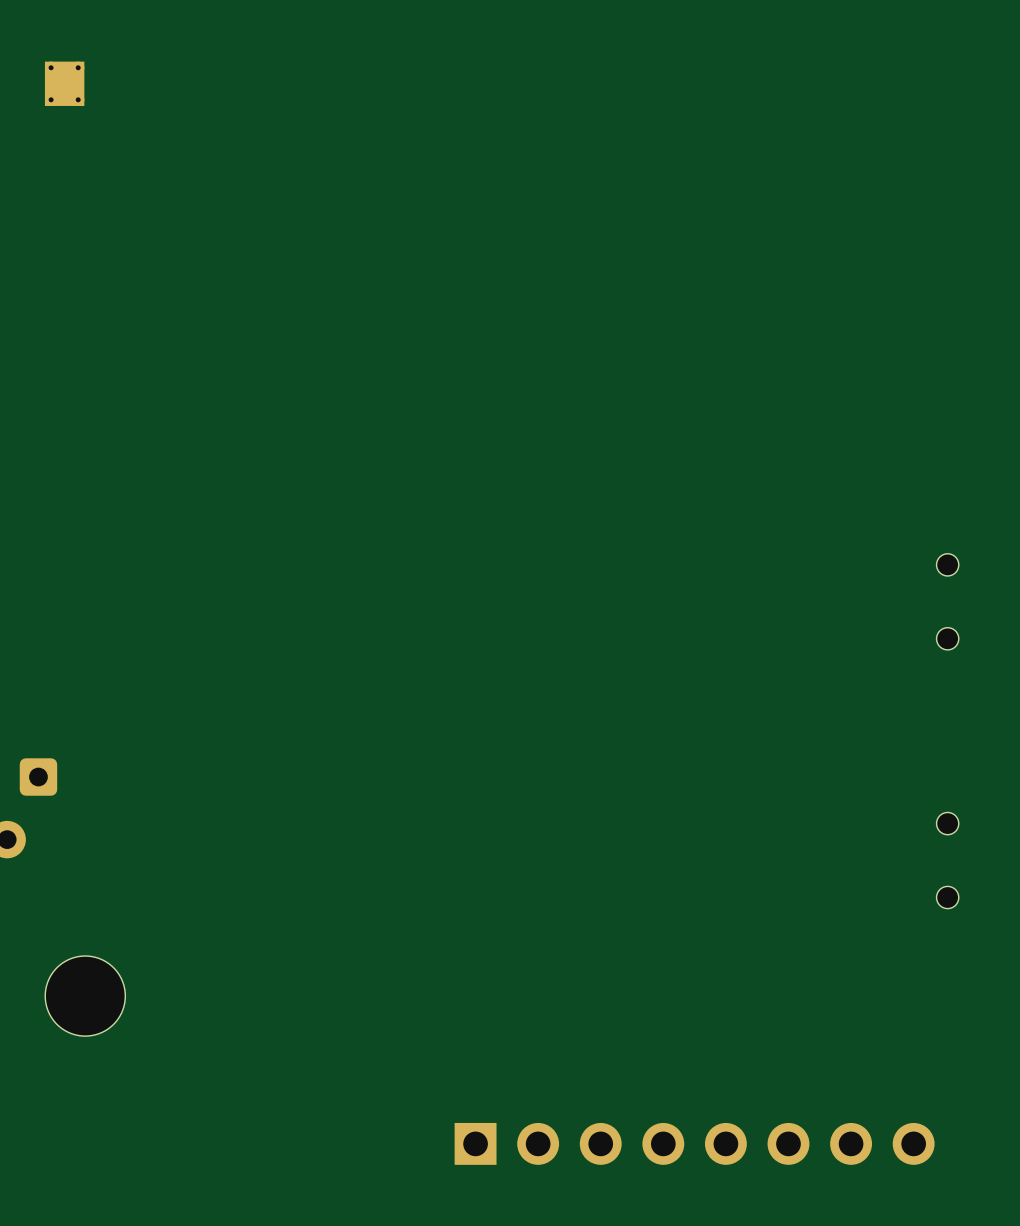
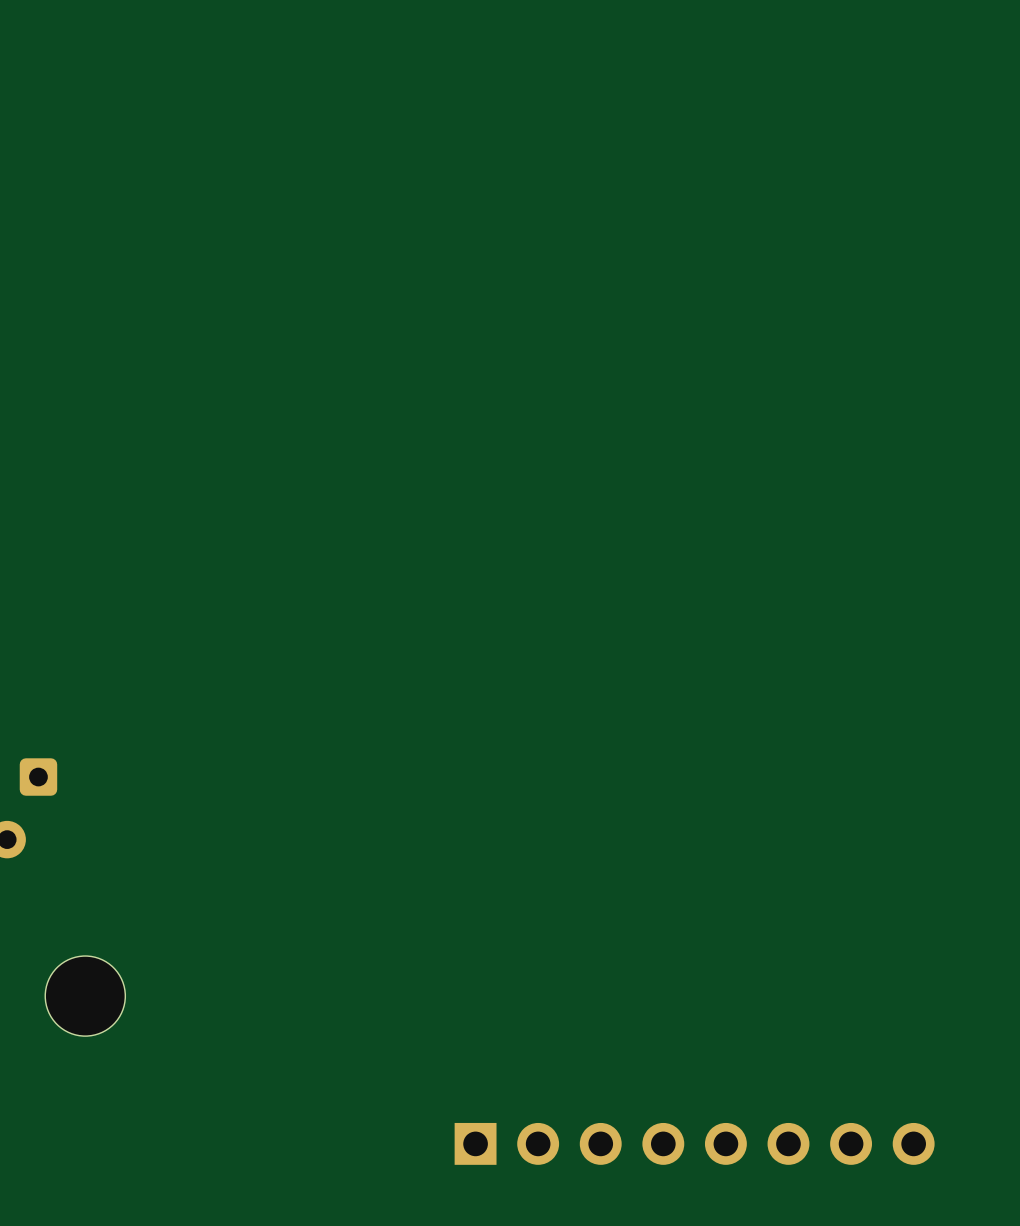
part: (64, 83) -> none
part: (947, 601) -> none
part: (947, 860) -> none

